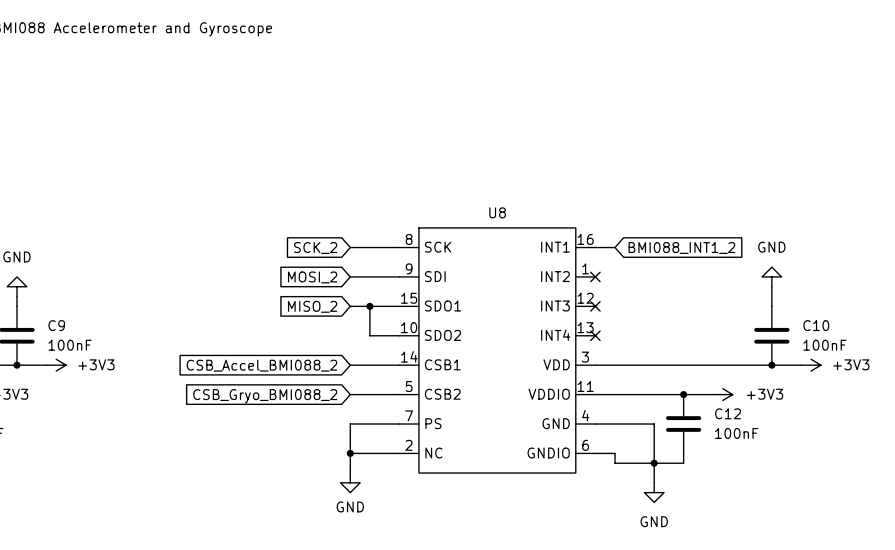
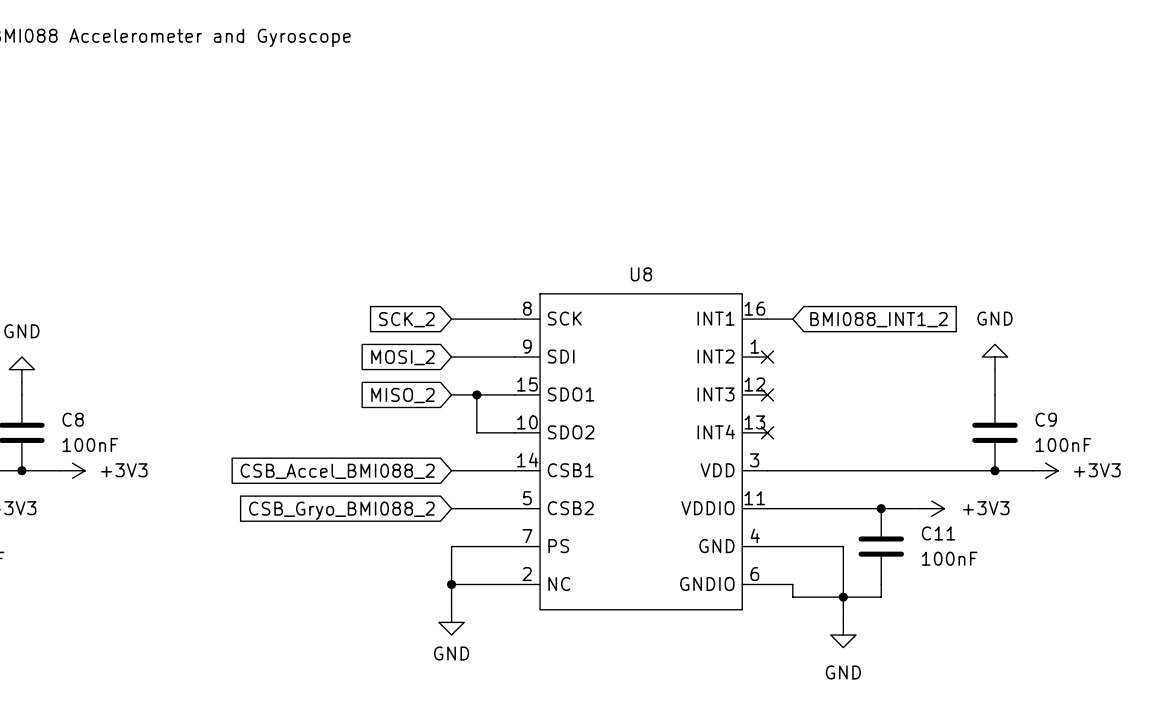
C9 name: C9 (56, 325) -> C8 (73, 419)
C10 name: C10 (816, 325) -> C9 (1046, 419)
C12 name: C12 (728, 413) -> C11 (938, 533)

